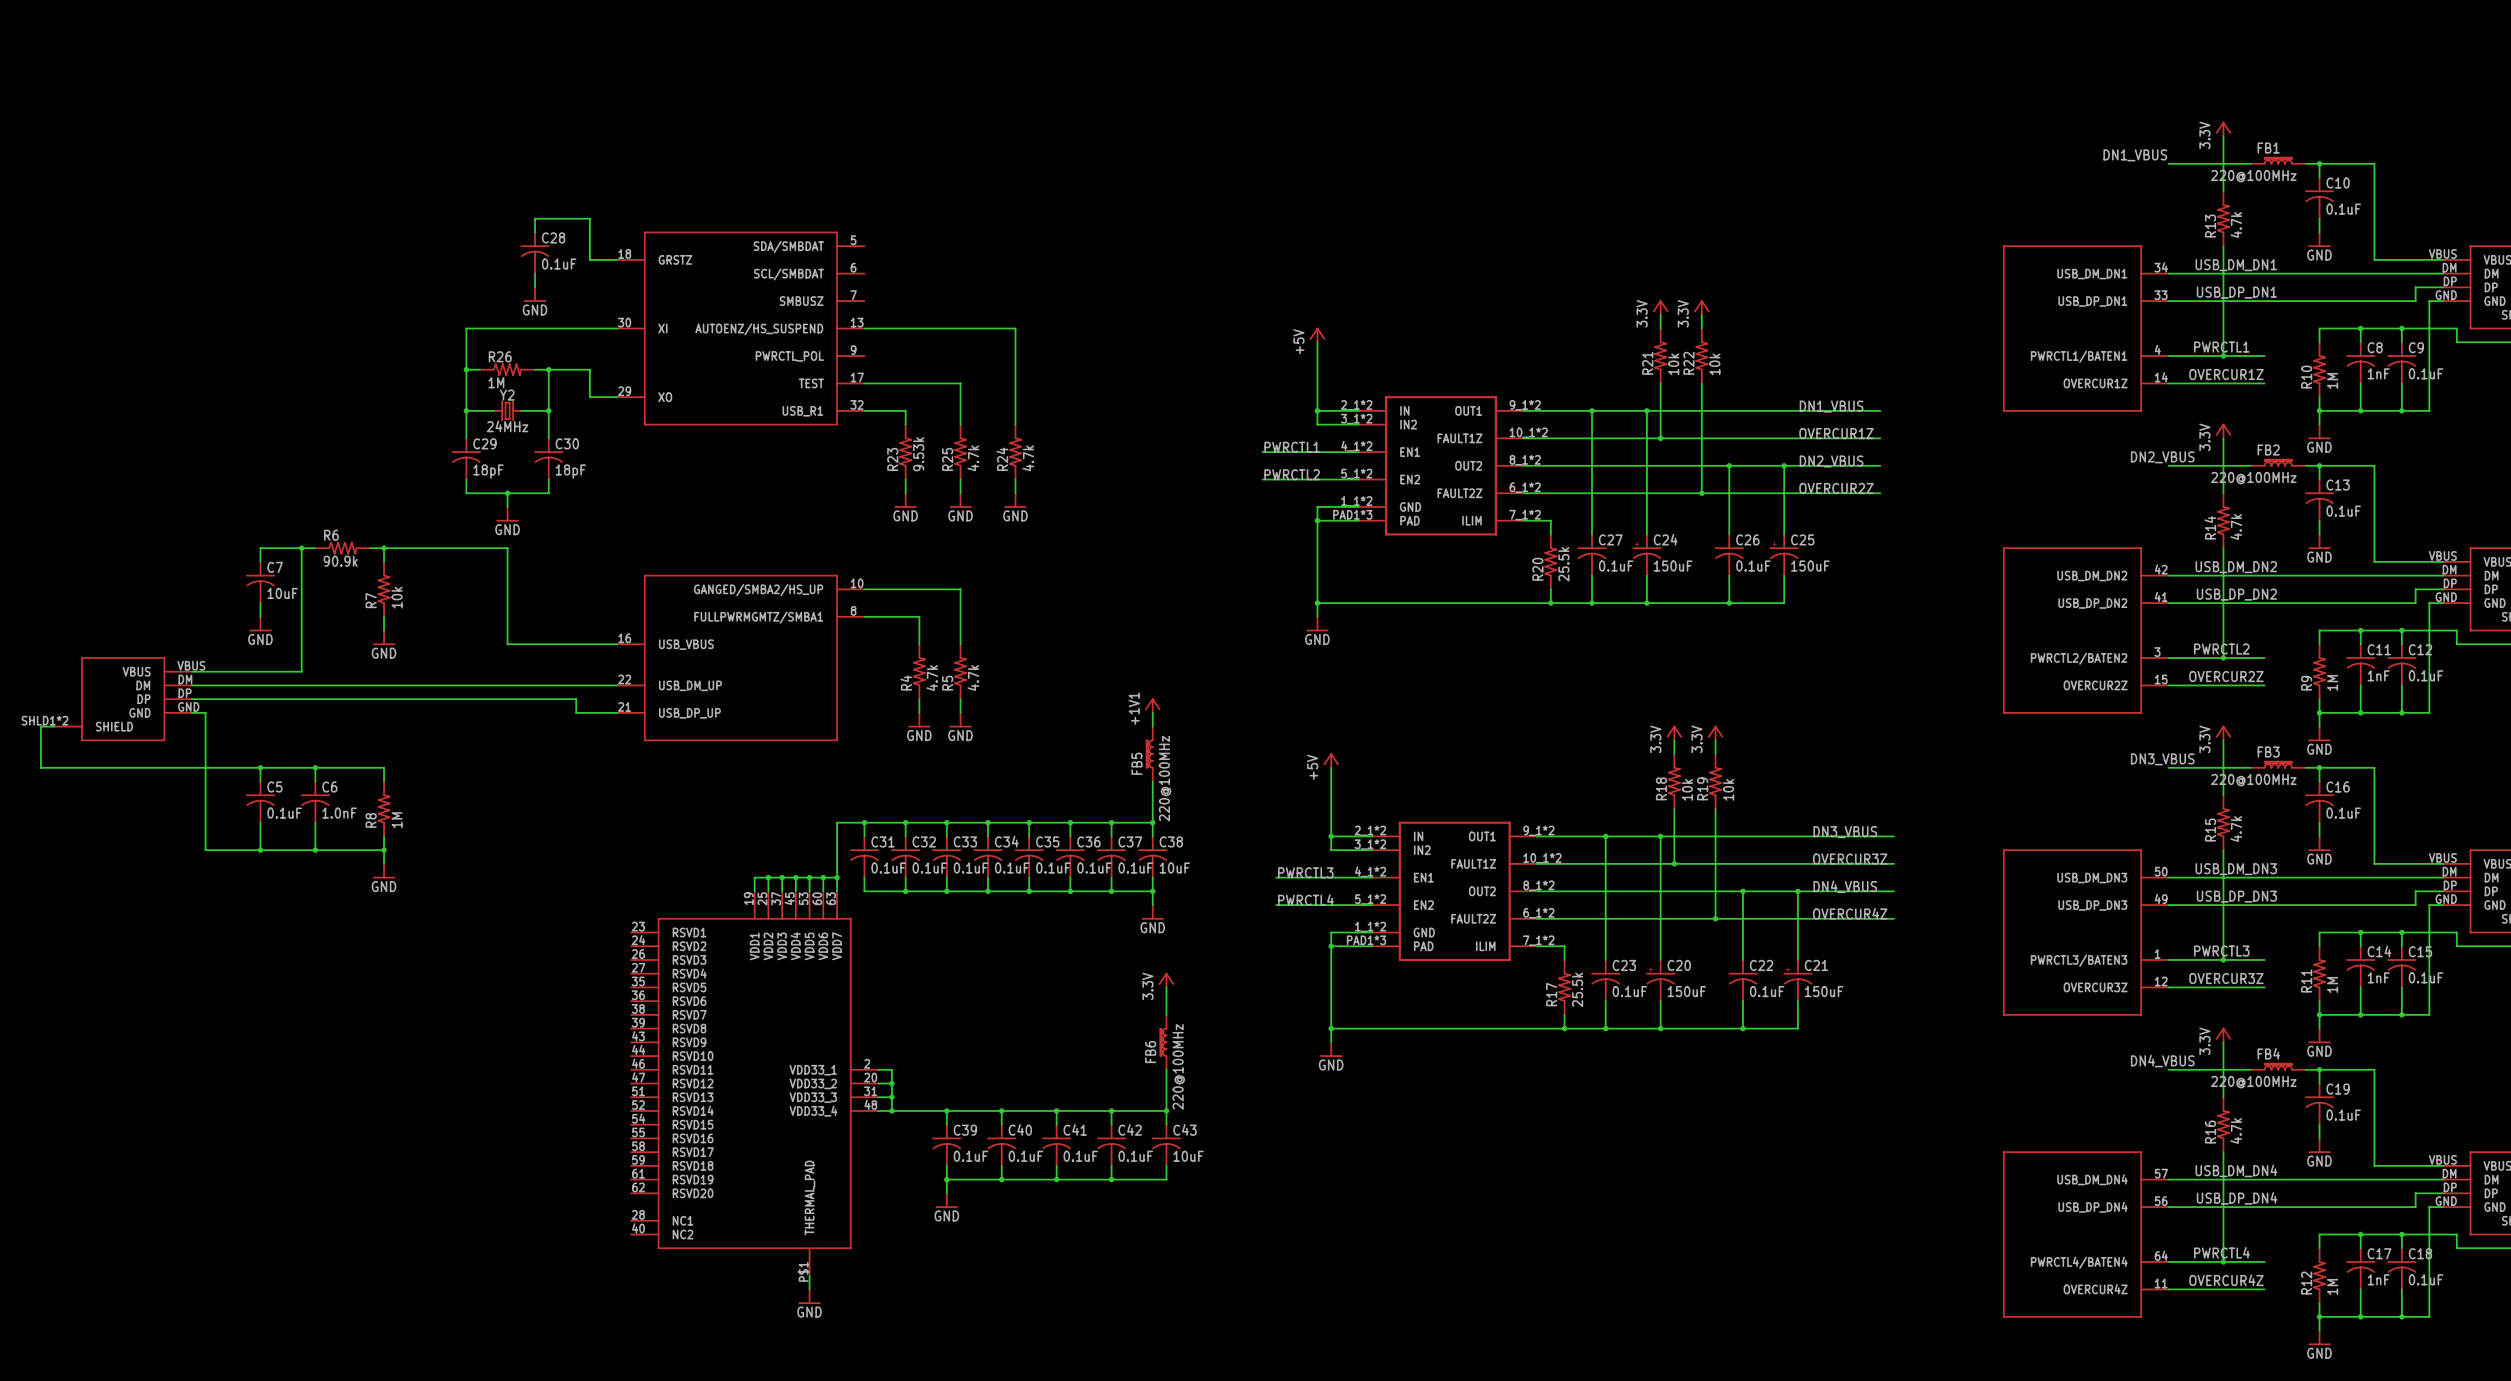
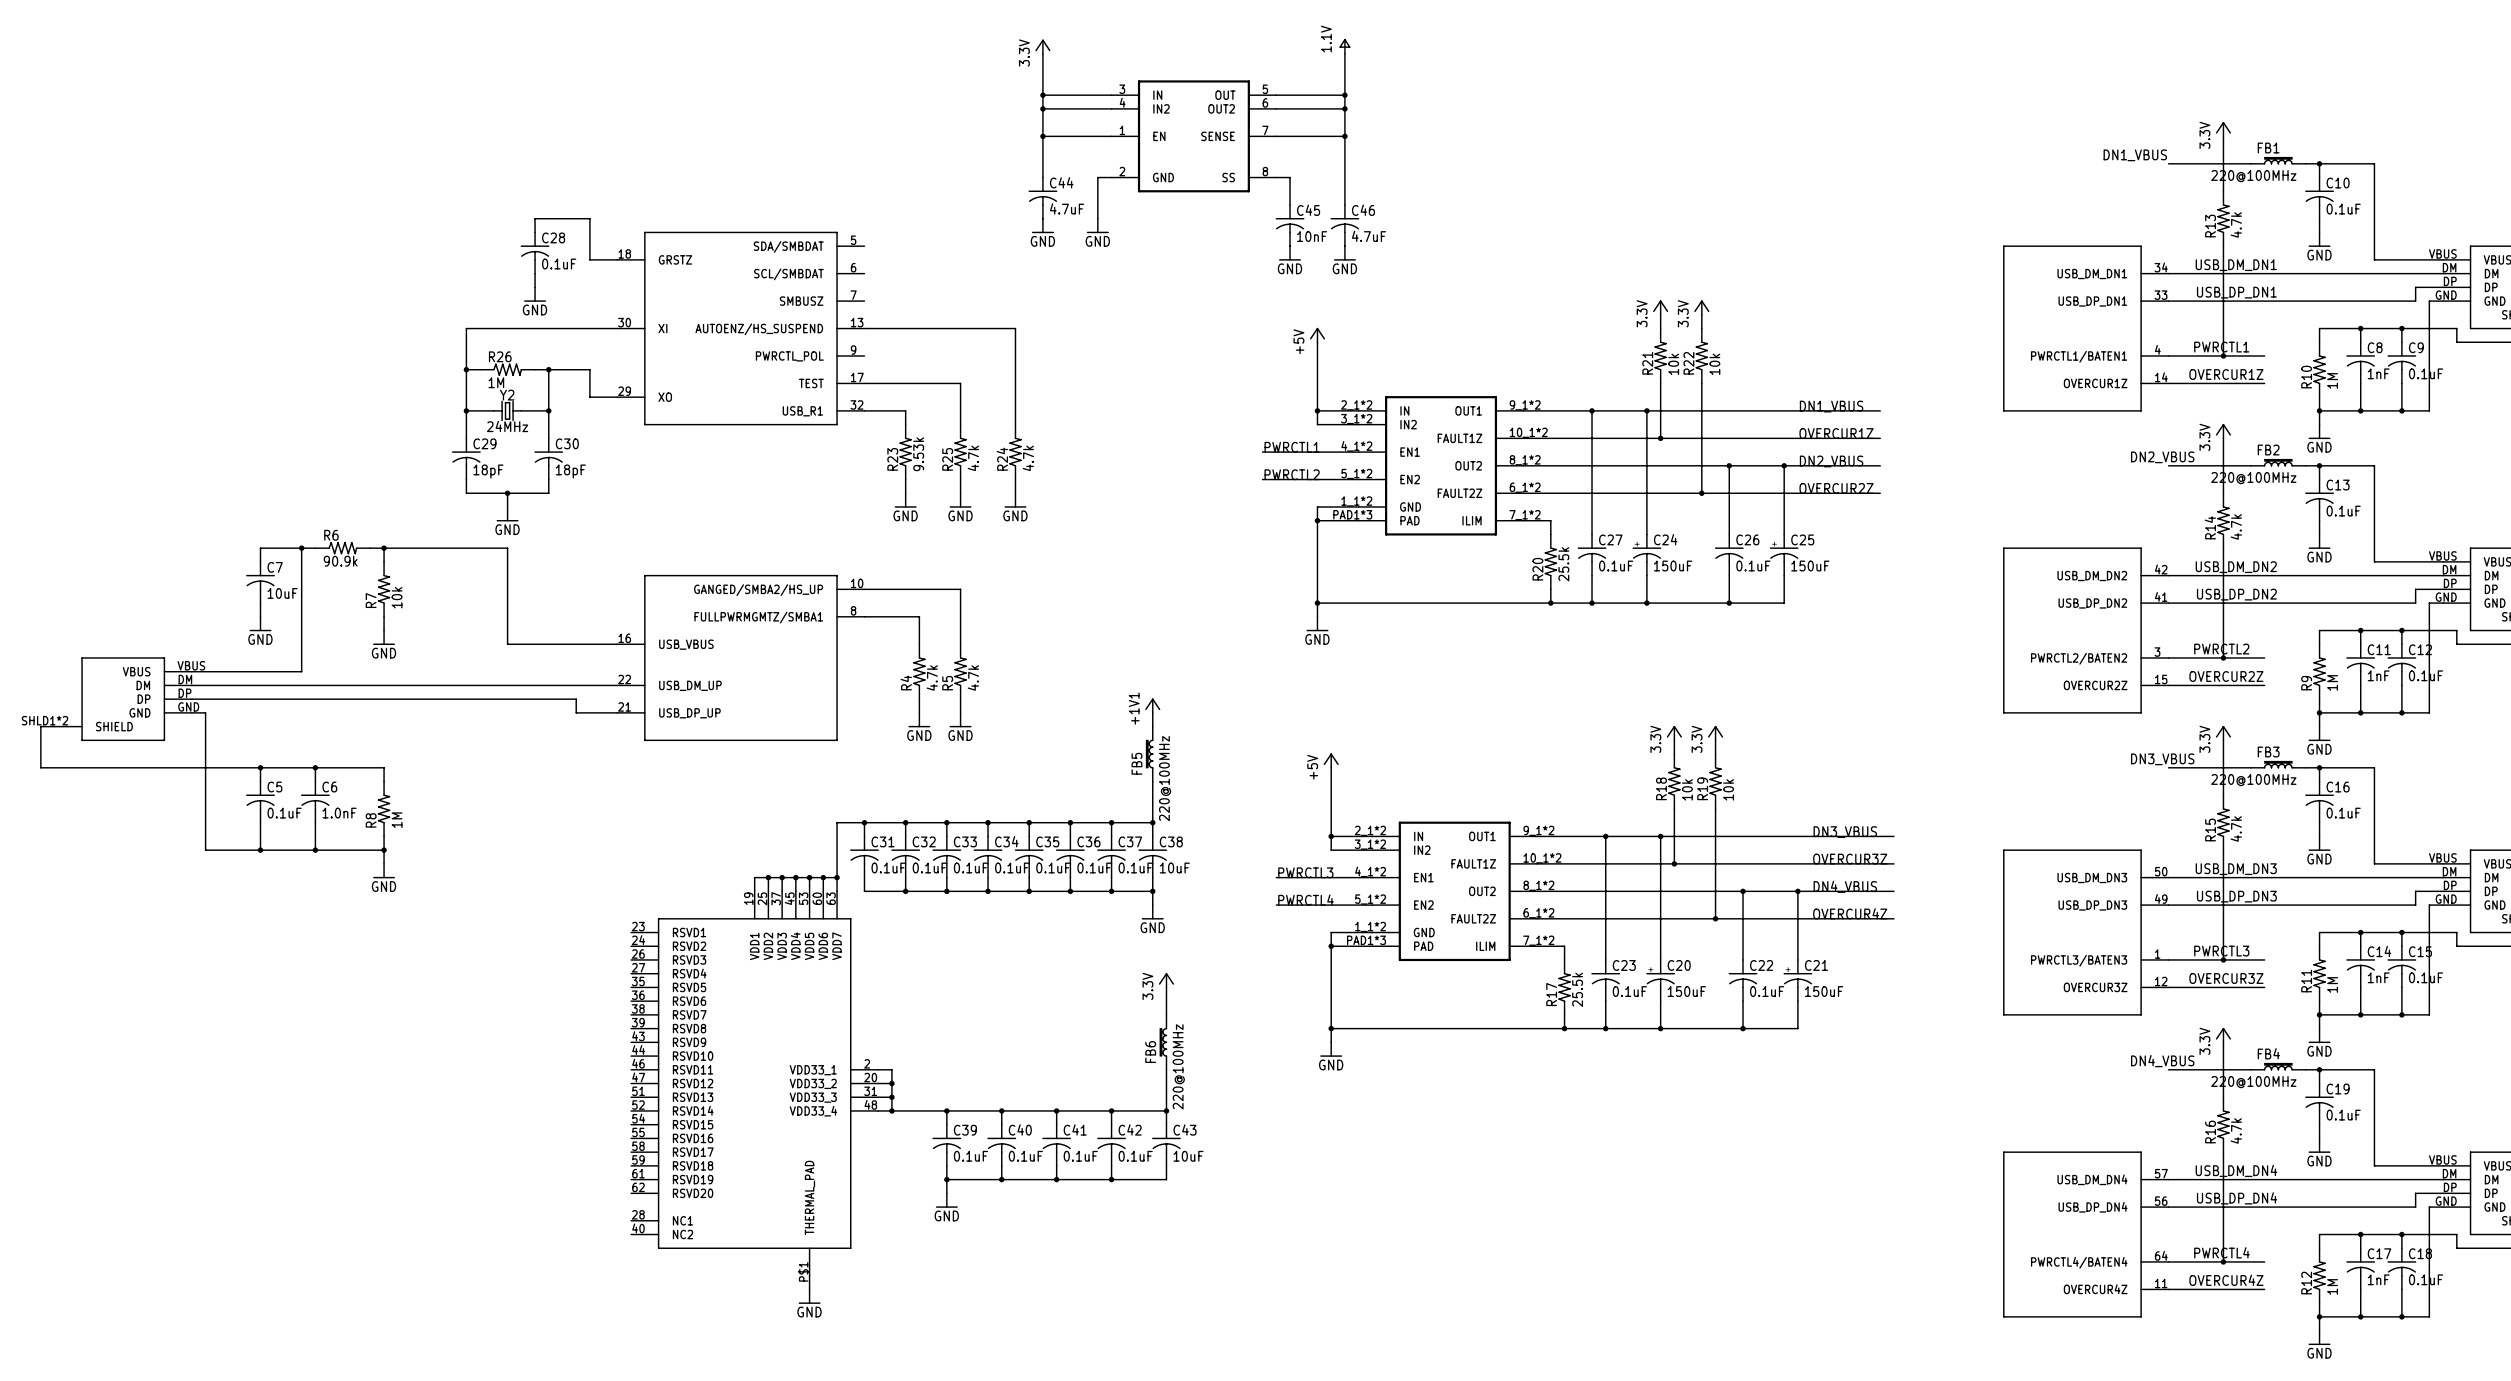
power symbol: none -> 3.3V (1042, 46)
power symbol: none -> 1.1V (1344, 46)
wire: none -> (1042, 54) (1042, 177)
wire: none -> (1344, 54) (1344, 204)
wire: none -> (1042, 95) (1111, 95)
junction: none -> (1042, 95)
wire: none -> (1276, 95) (1344, 95)
junction: none -> (1344, 95)
wire: none -> (1042, 108) (1111, 108)
junction: none -> (1042, 108)
wire: none -> (1276, 108) (1344, 108)
junction: none -> (1344, 108)
wire: none -> (1042, 136) (1111, 136)
junction: none -> (1042, 136)
part: none -> (1193, 136)
wire: none -> (1276, 136) (1344, 136)
junction: none -> (1344, 136)
wire: none -> (1111, 177) (1097, 177) (1097, 218)
wire: none -> (1276, 177) (1290, 177) (1290, 204)
C44: none -> 4.7uF (1042, 198)
power symbol: none -> GND (1042, 225)
power symbol: none -> GND (1097, 225)
C45: none -> 10nF (1290, 225)
C46: none -> 4.7uF (1344, 225)
power symbol: none -> GND (1290, 253)
power symbol: none -> GND (1344, 253)

